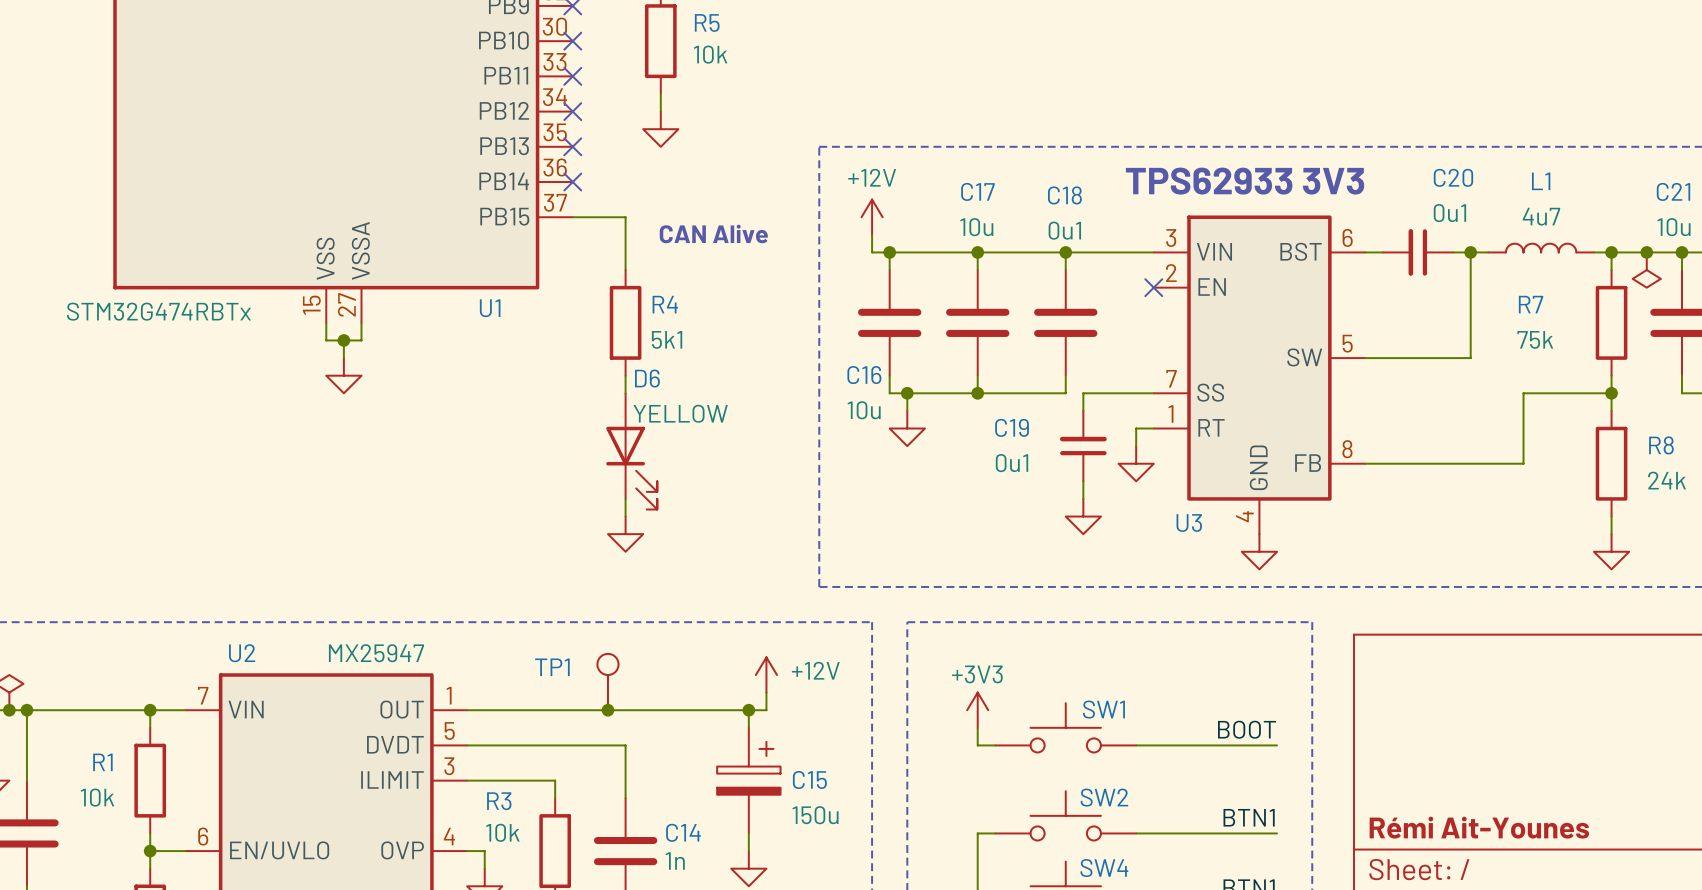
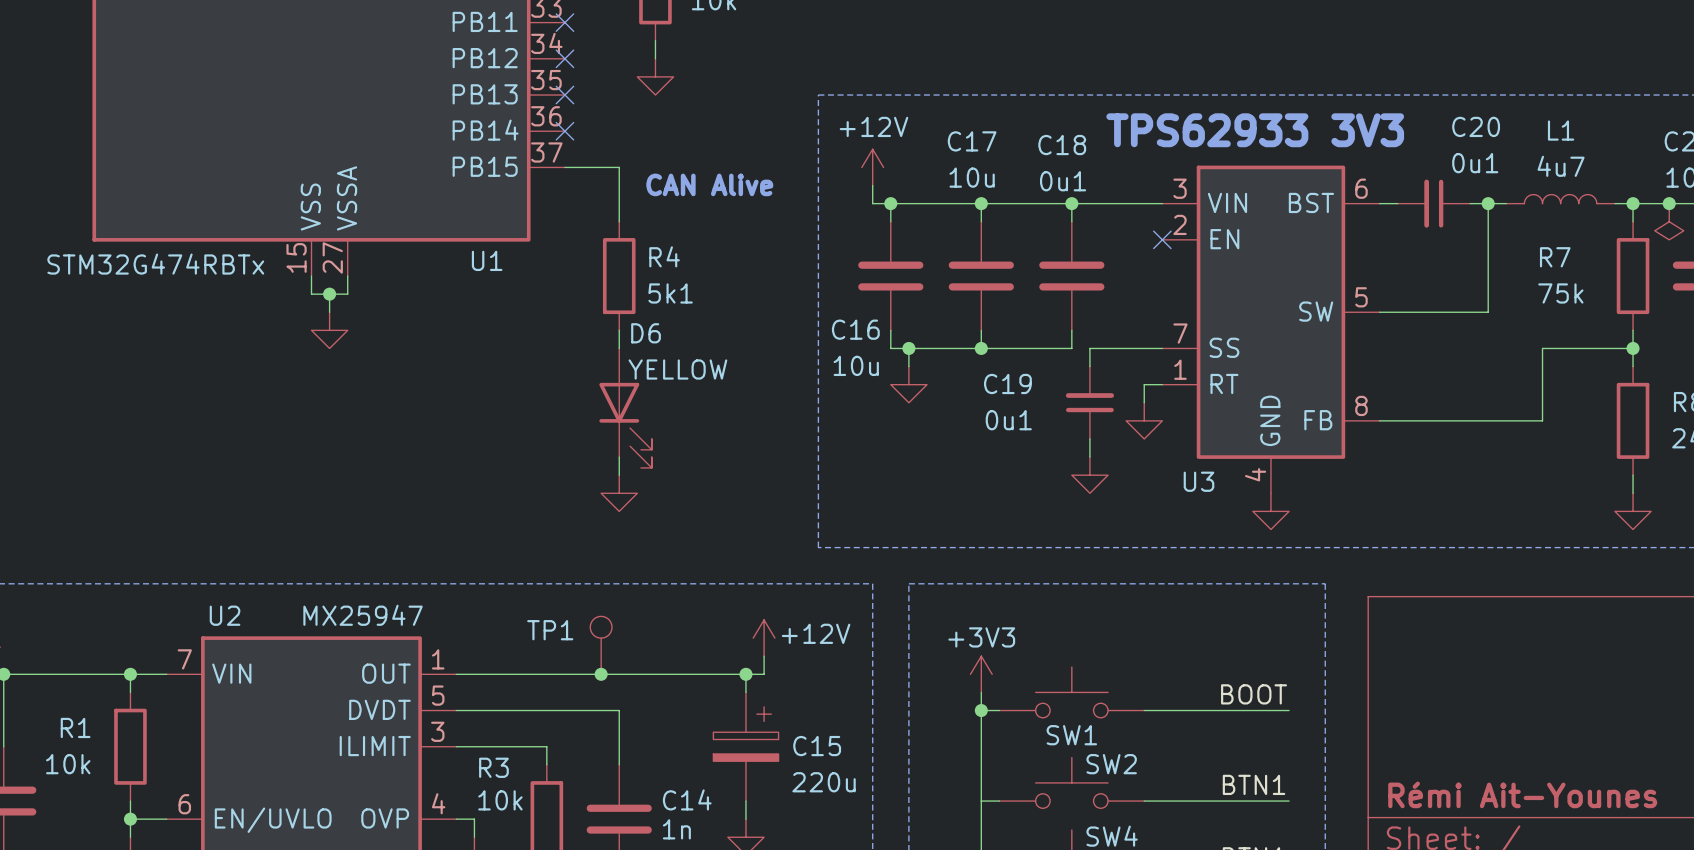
SW1 name position: SW1 (1103, 709) -> SW1 (1071, 735)
wire: none -> (981, 710) (981, 801)
junction: none -> (981, 710)
C15 value: 150u (815, 815) -> 220u (824, 782)

